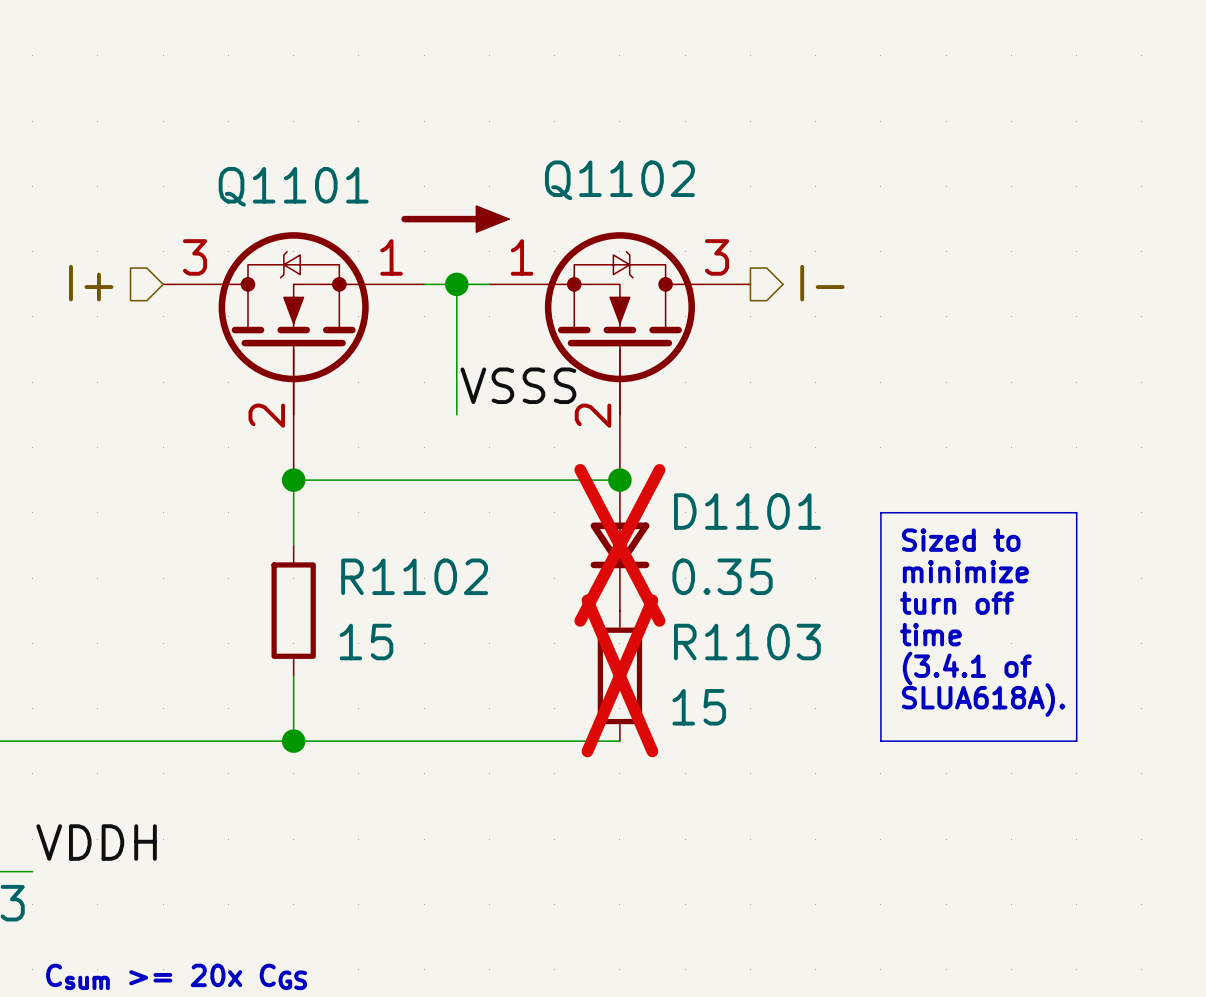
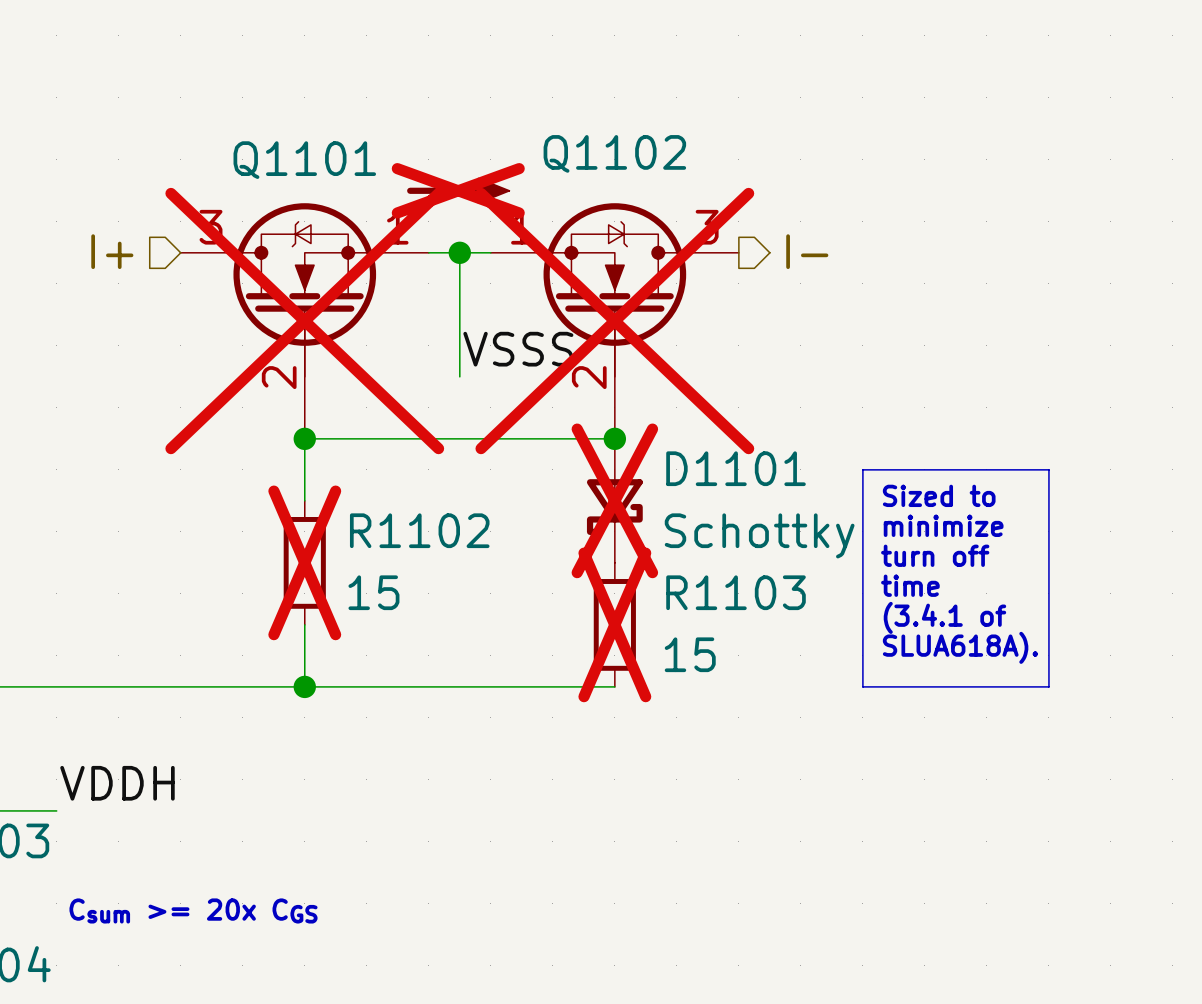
power symbol do-not-place cross: none -> (458, 190)
Q1101 do-not-place cross: none -> (304, 321)
Q1102 do-not-place cross: none -> (614, 321)
D1101 symbol: [590, 480, 650, 611] -> [586, 438, 643, 563]
D1101 value: 0.35 (722, 576) -> Schottky (759, 535)
R1102 do-not-place cross: none -> (304, 562)

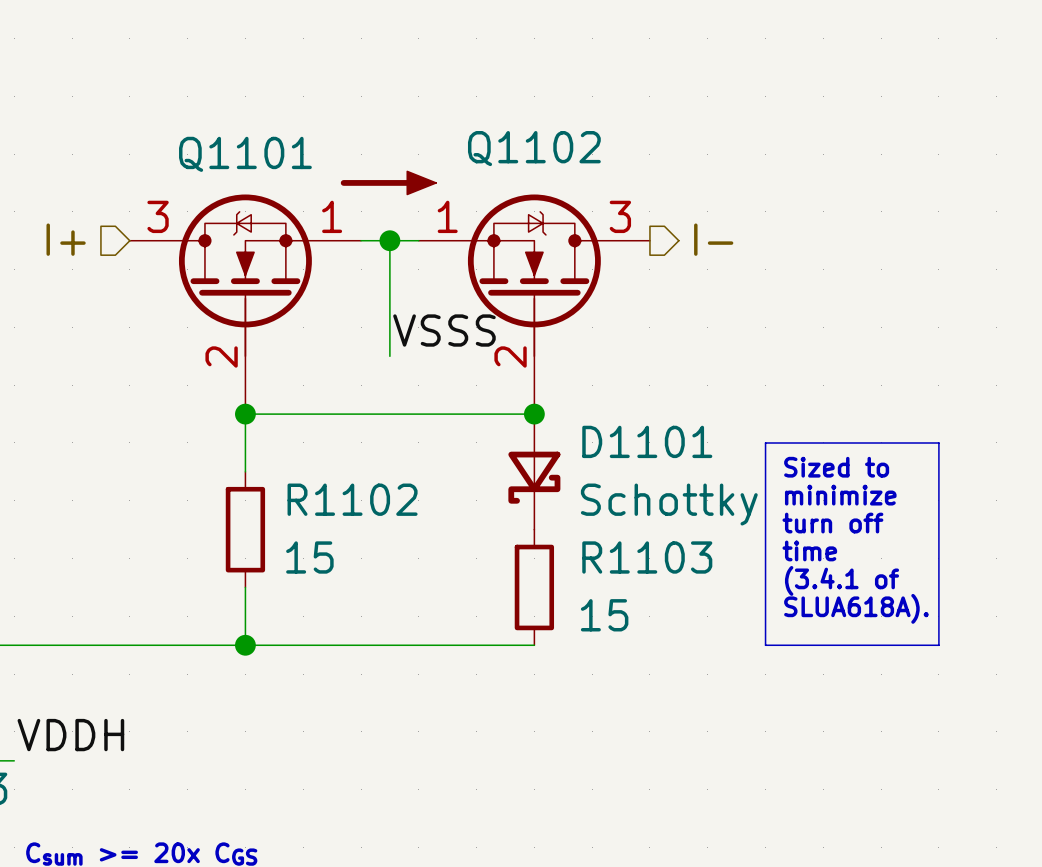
power symbol do-not-place cross: (458, 190) -> none
Q1101 do-not-place cross: (304, 321) -> none
Q1102 do-not-place cross: (614, 321) -> none
D1101 do-not-place cross: (614, 500) -> none
R1102 do-not-place cross: (304, 562) -> none
R1103 do-not-place cross: (614, 624) -> none

